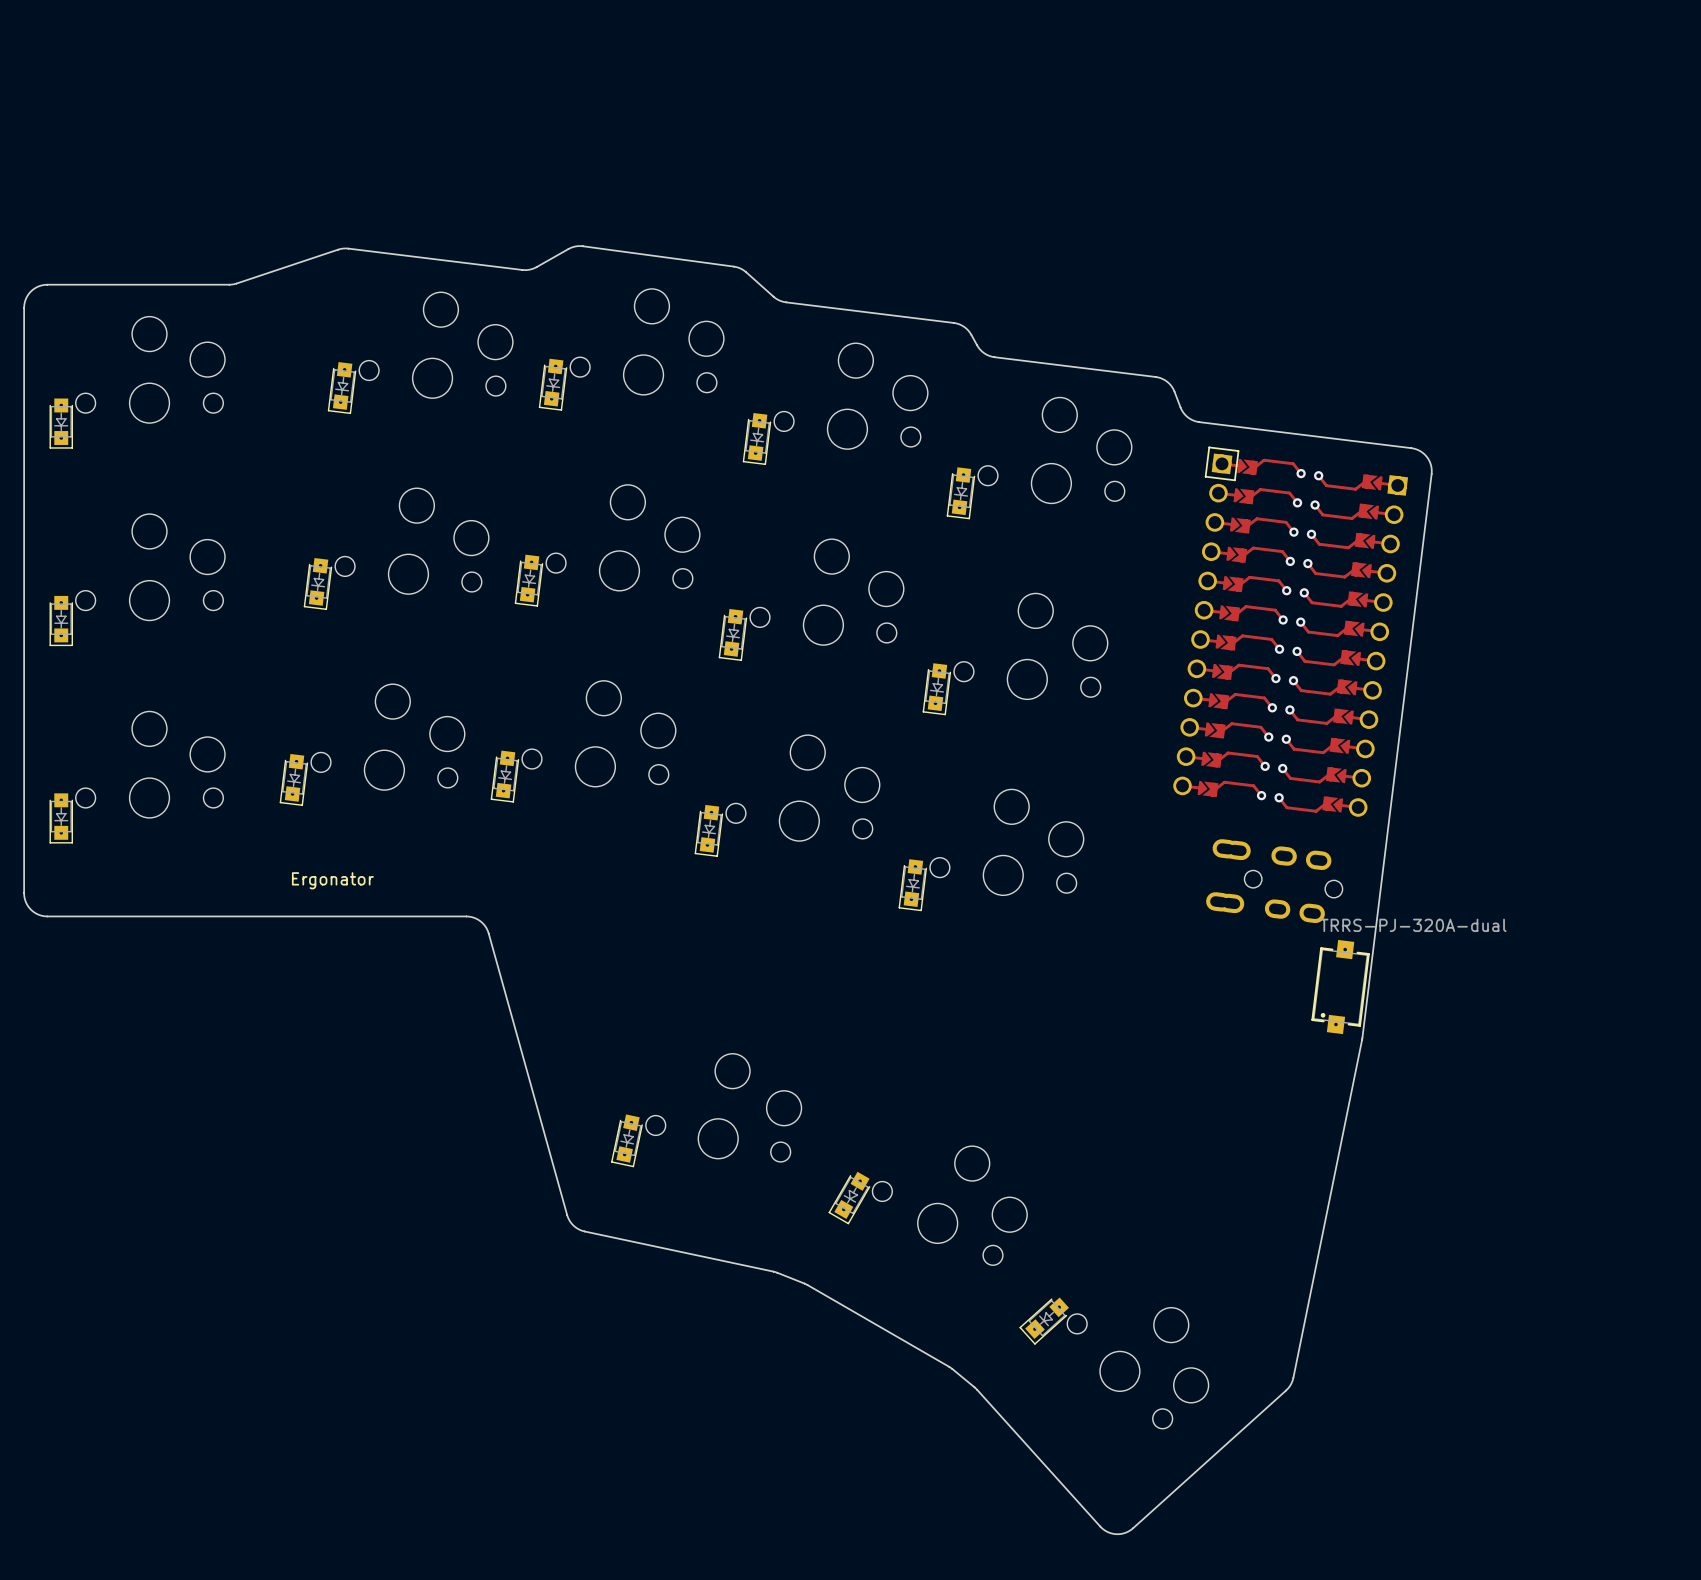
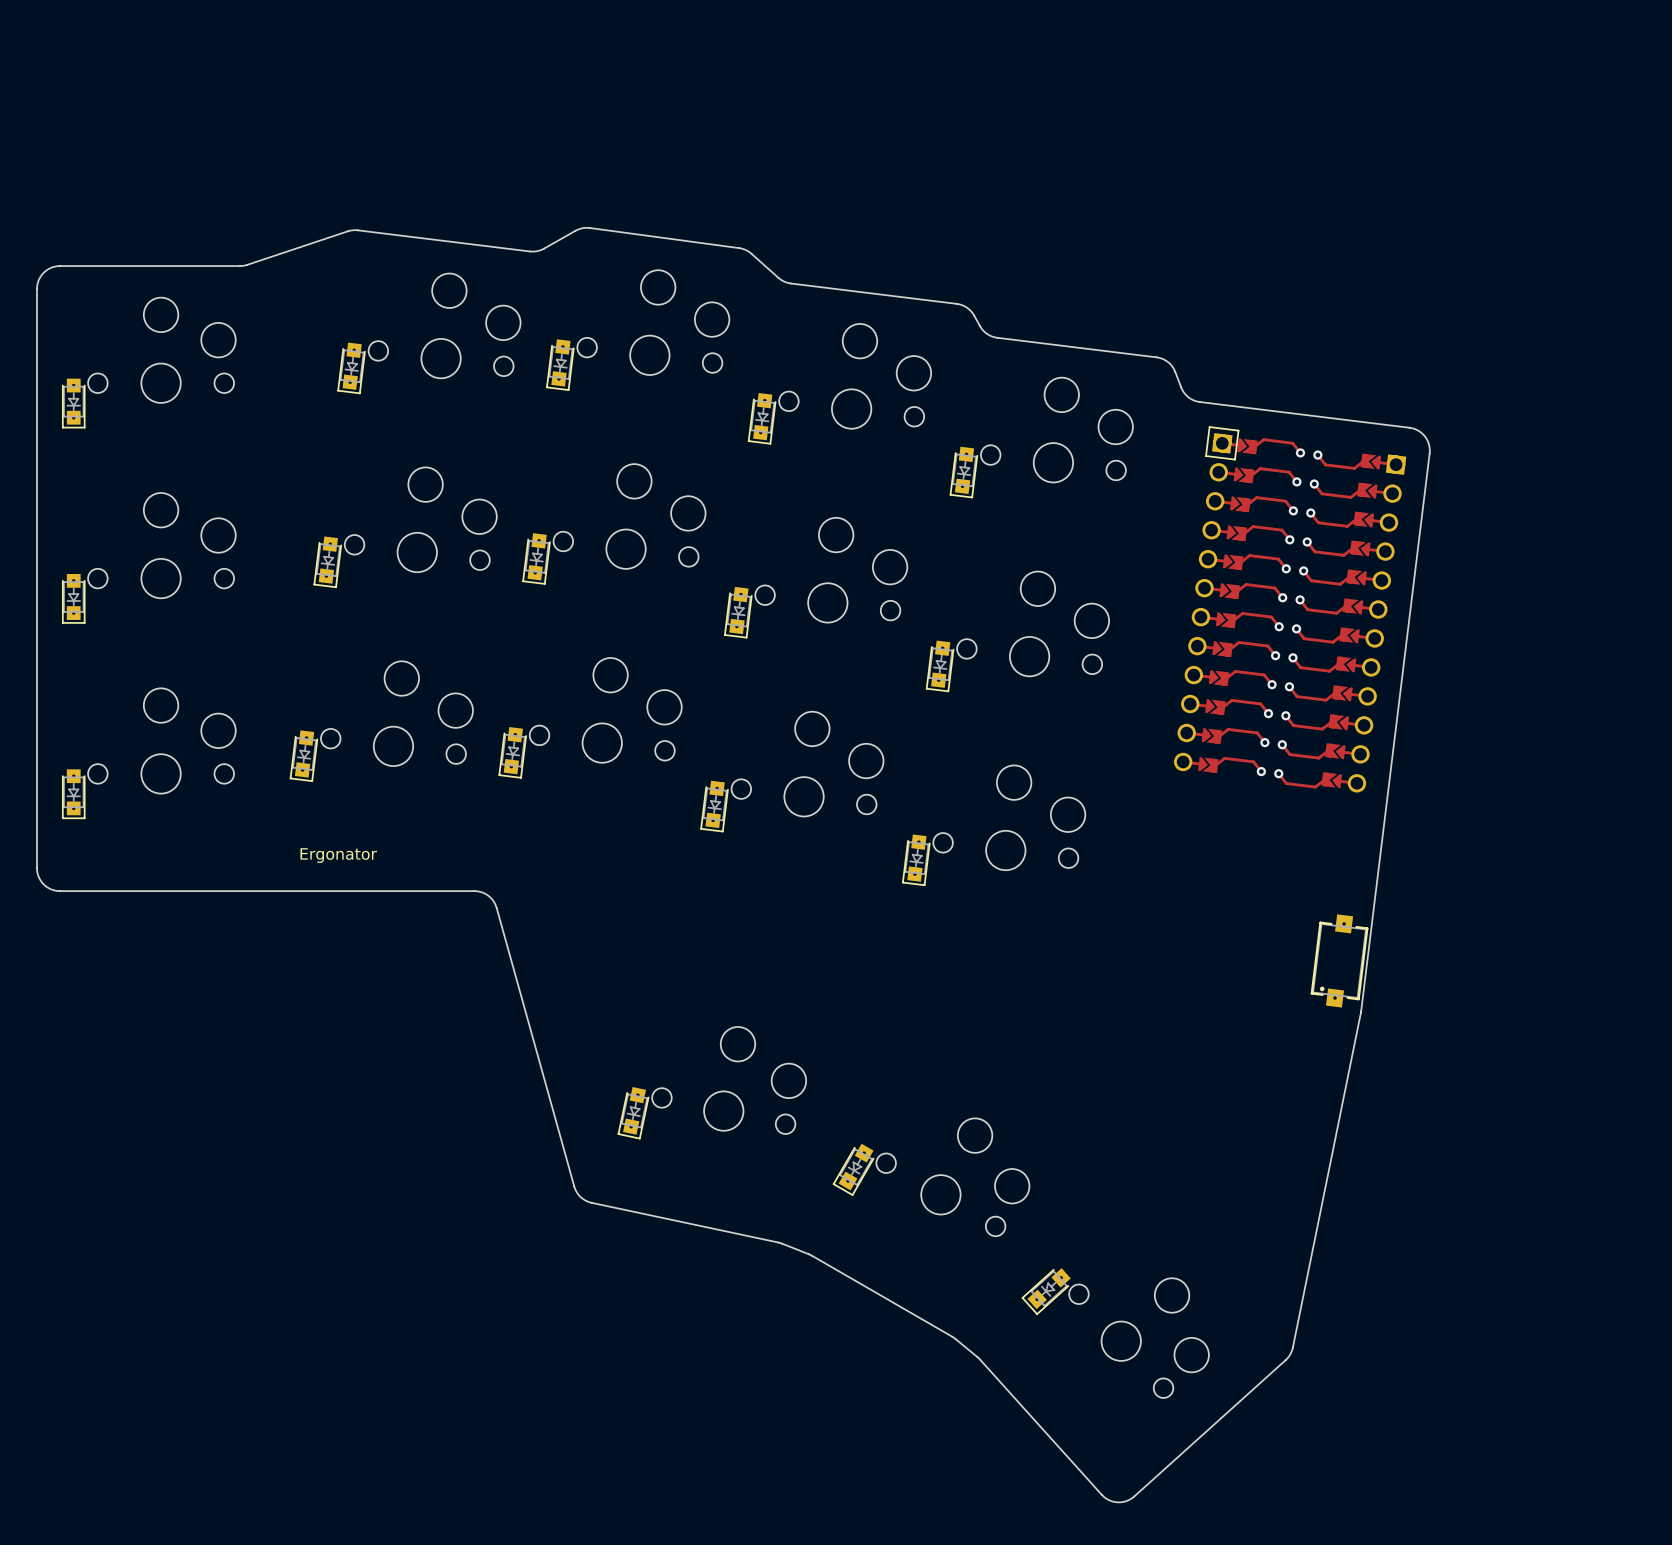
part: TRRS-PJ-320A-dual (1274, 881) -> none

